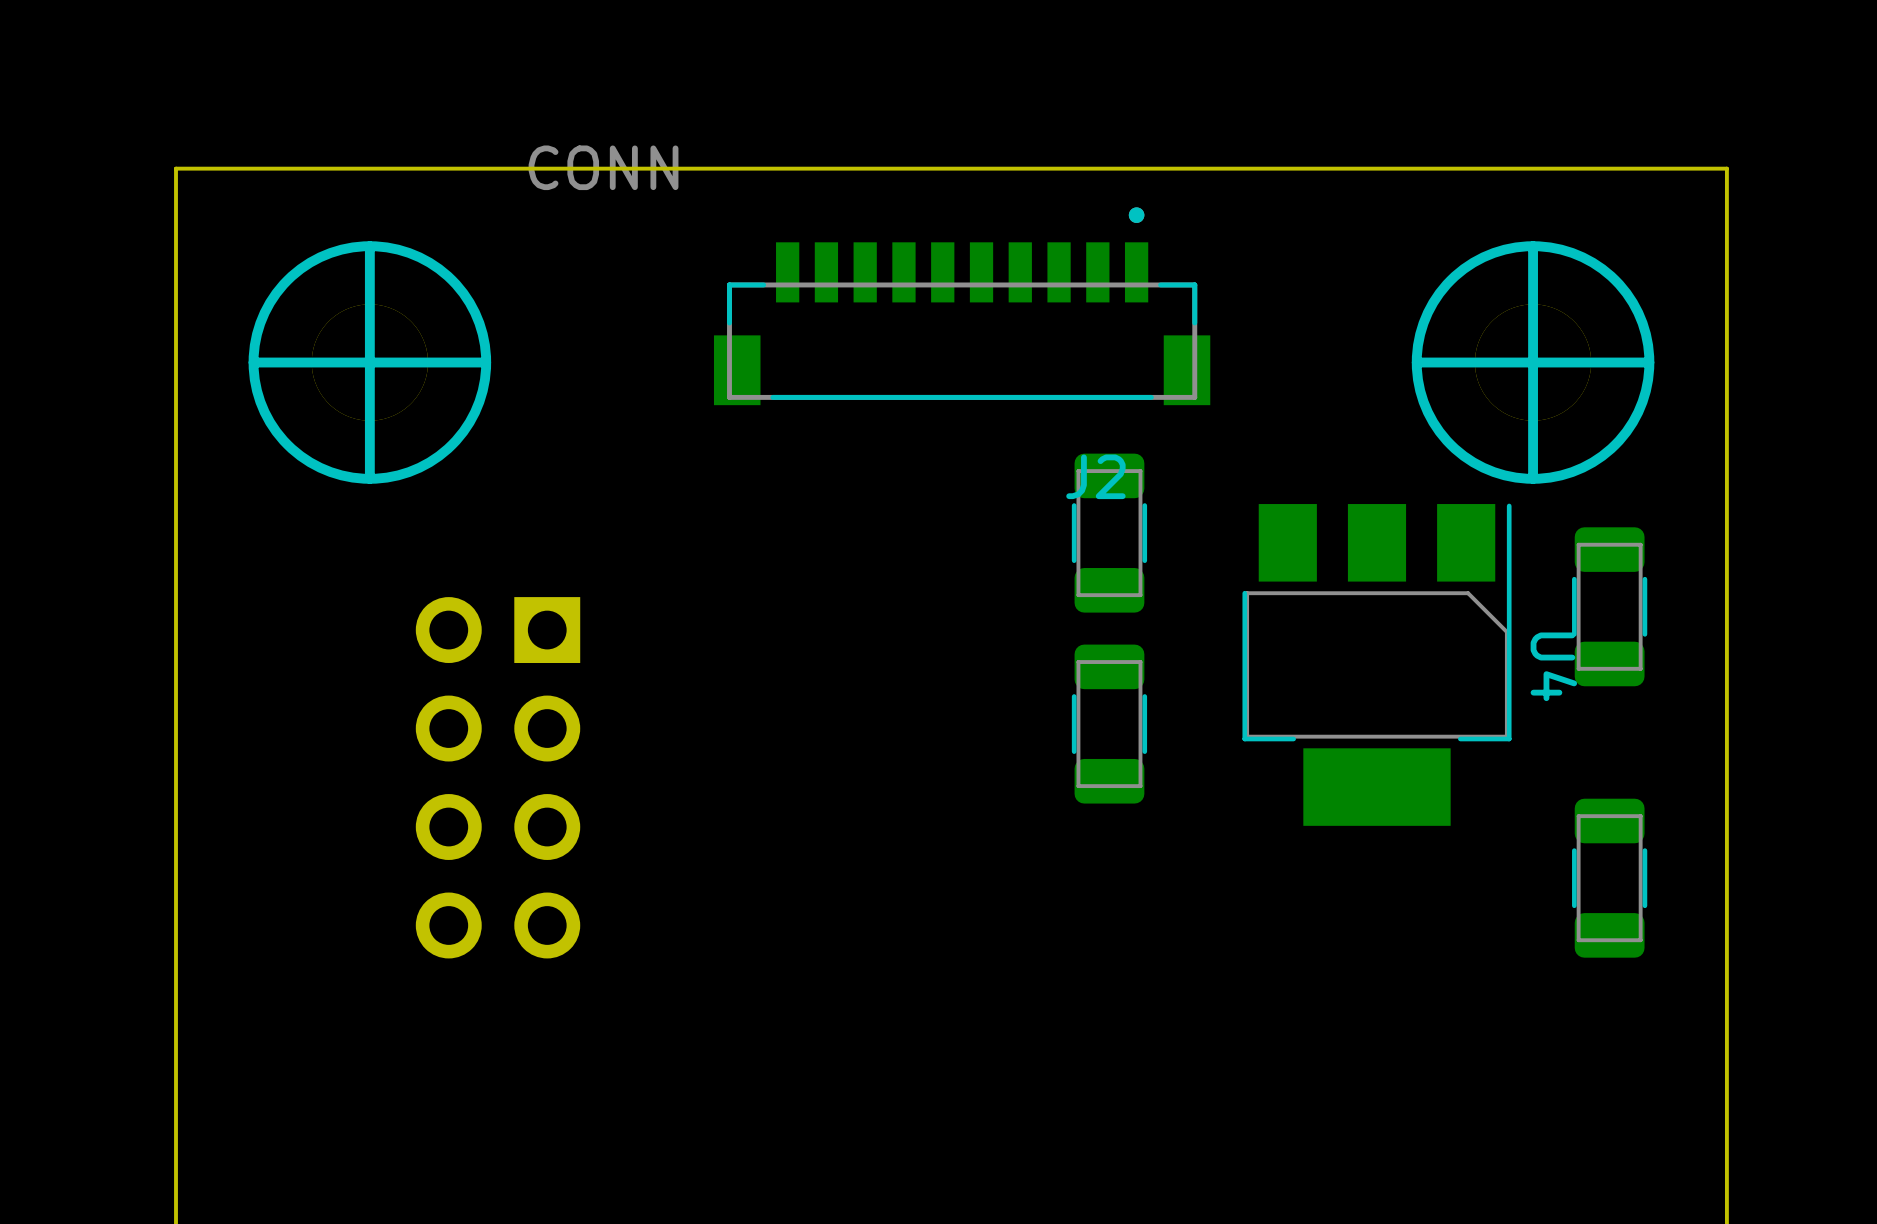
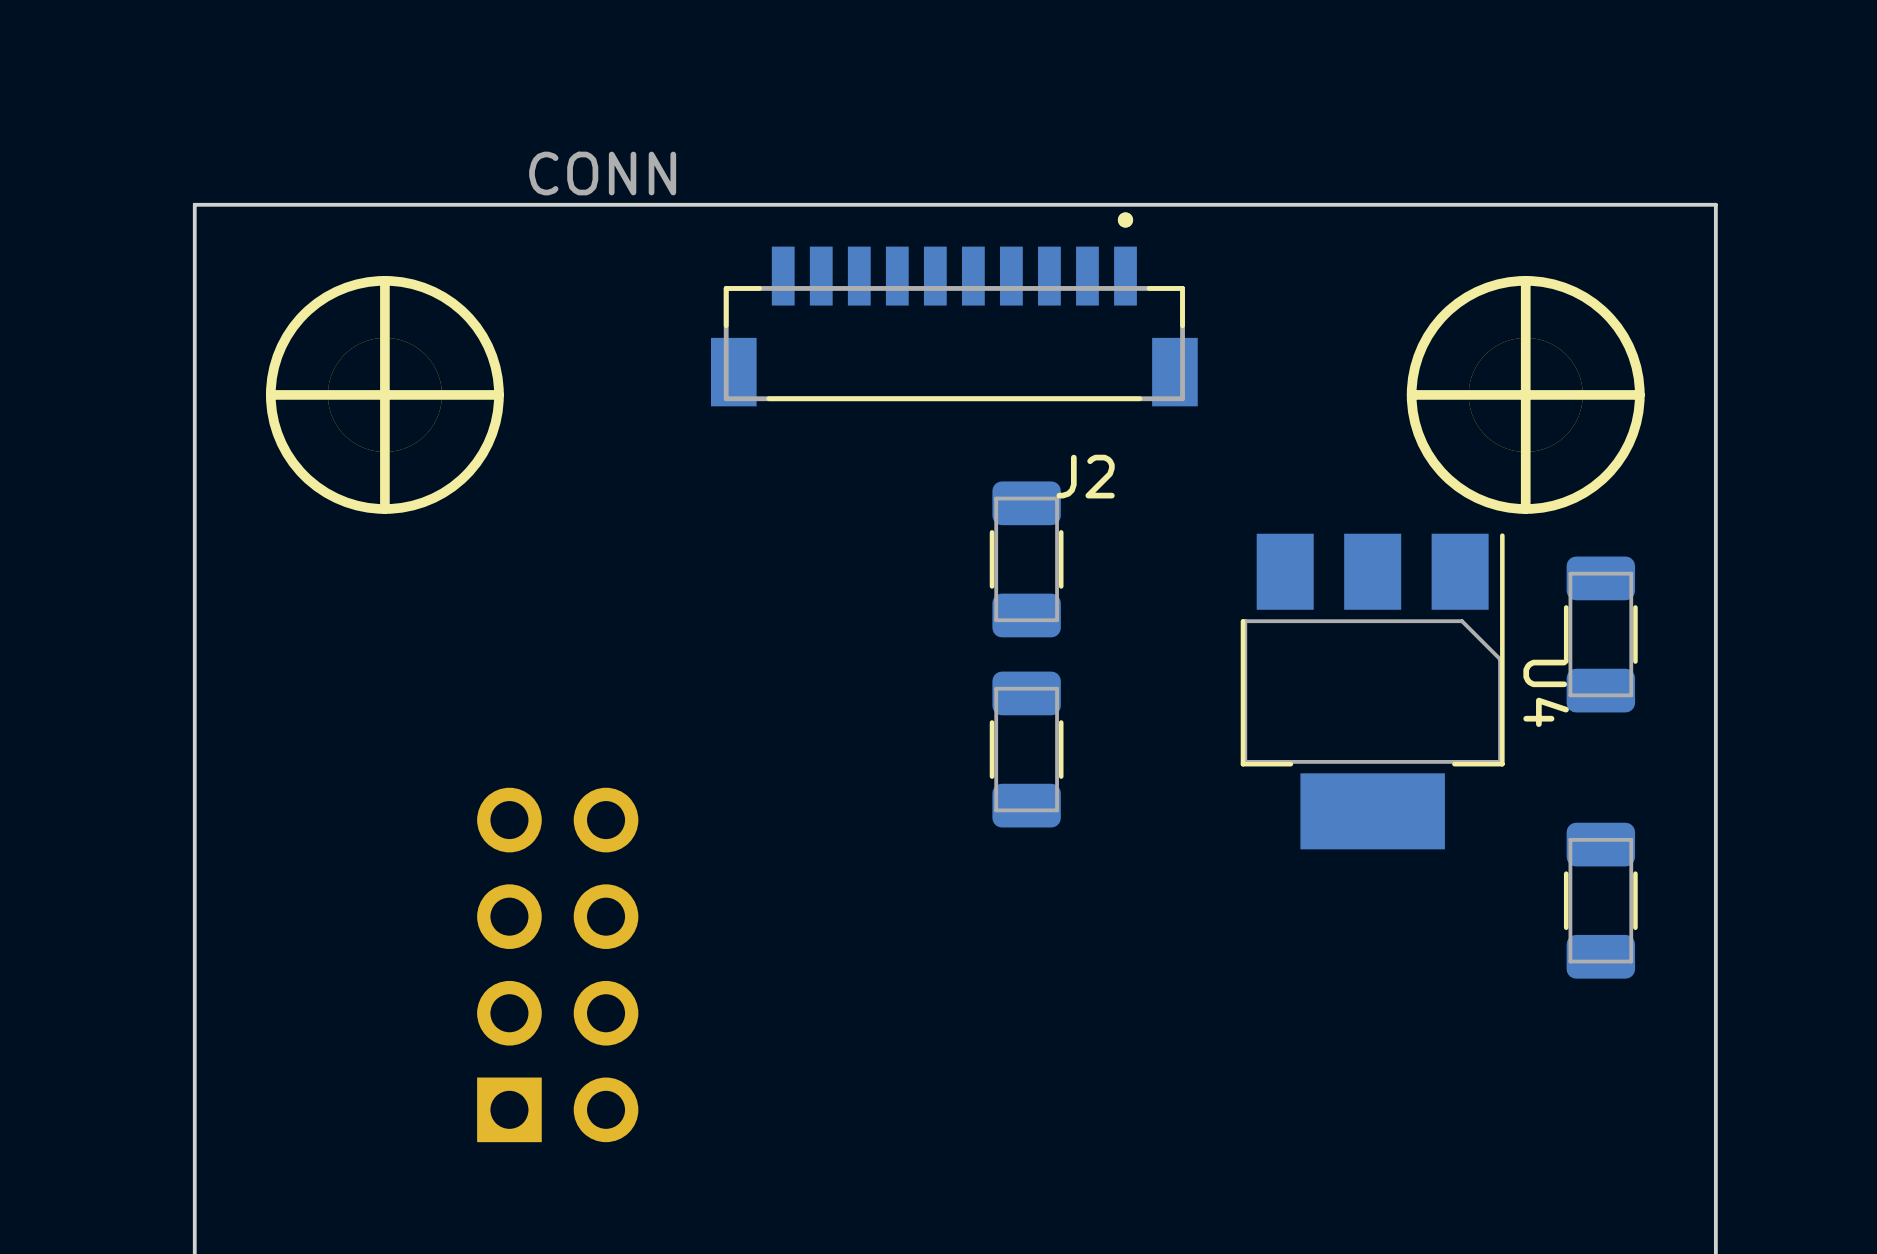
J2 position: (962, 306) -> (954, 309)
part position: (1109, 533) -> (1026, 559)
part position: (1109, 724) -> (1026, 749)
part rotation: 0° (498, 777) -> 180° (557, 964)

